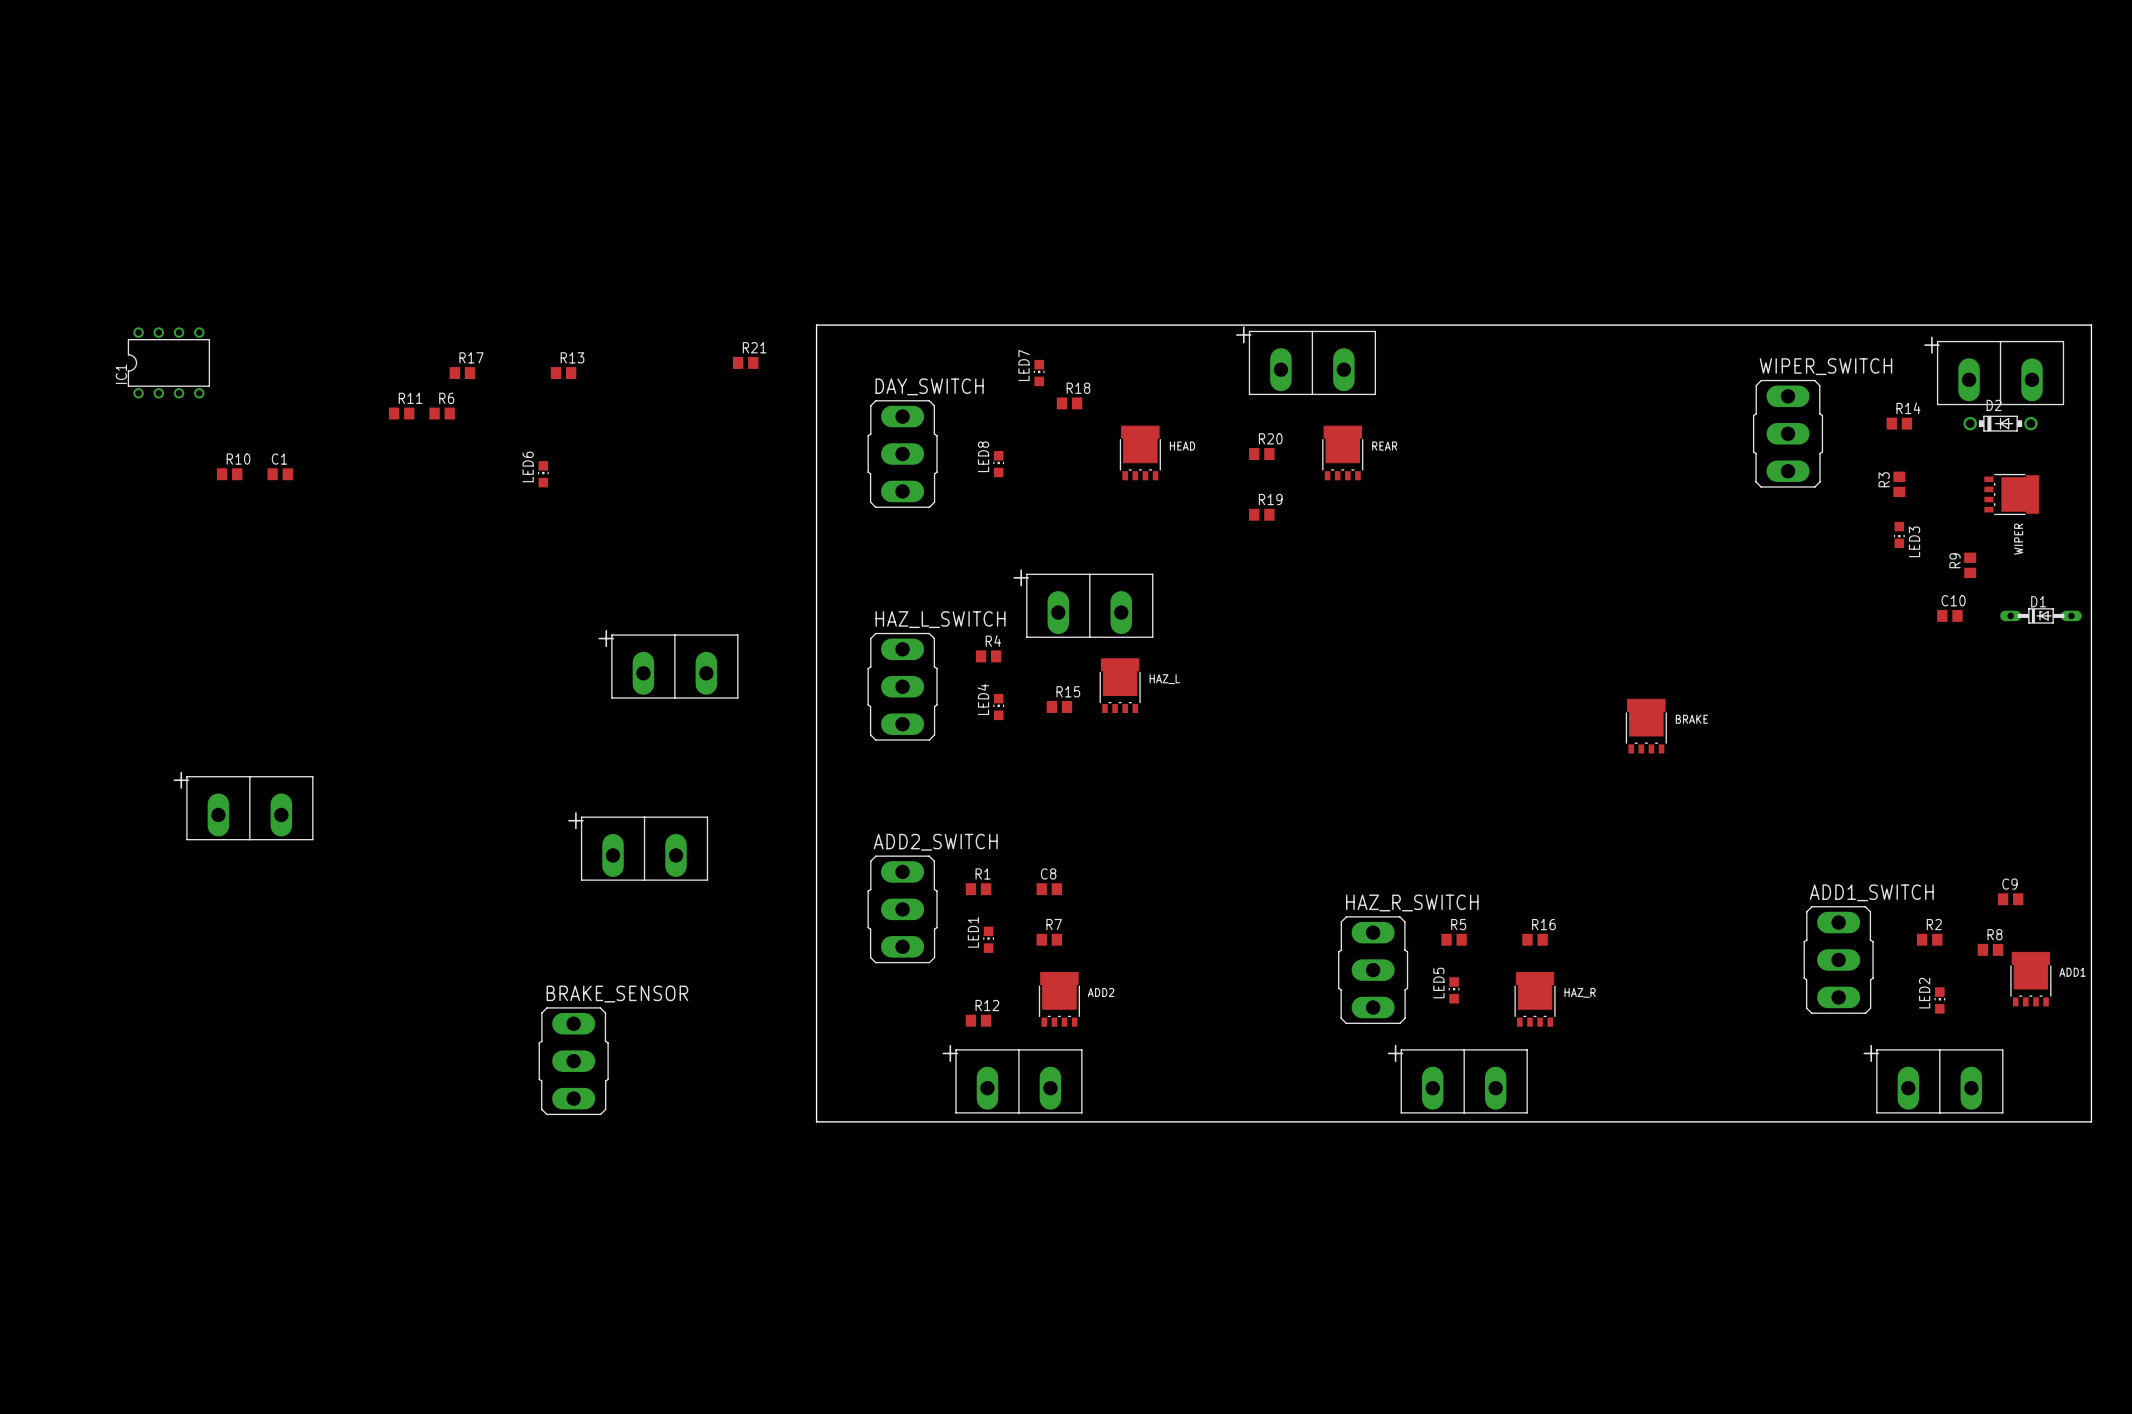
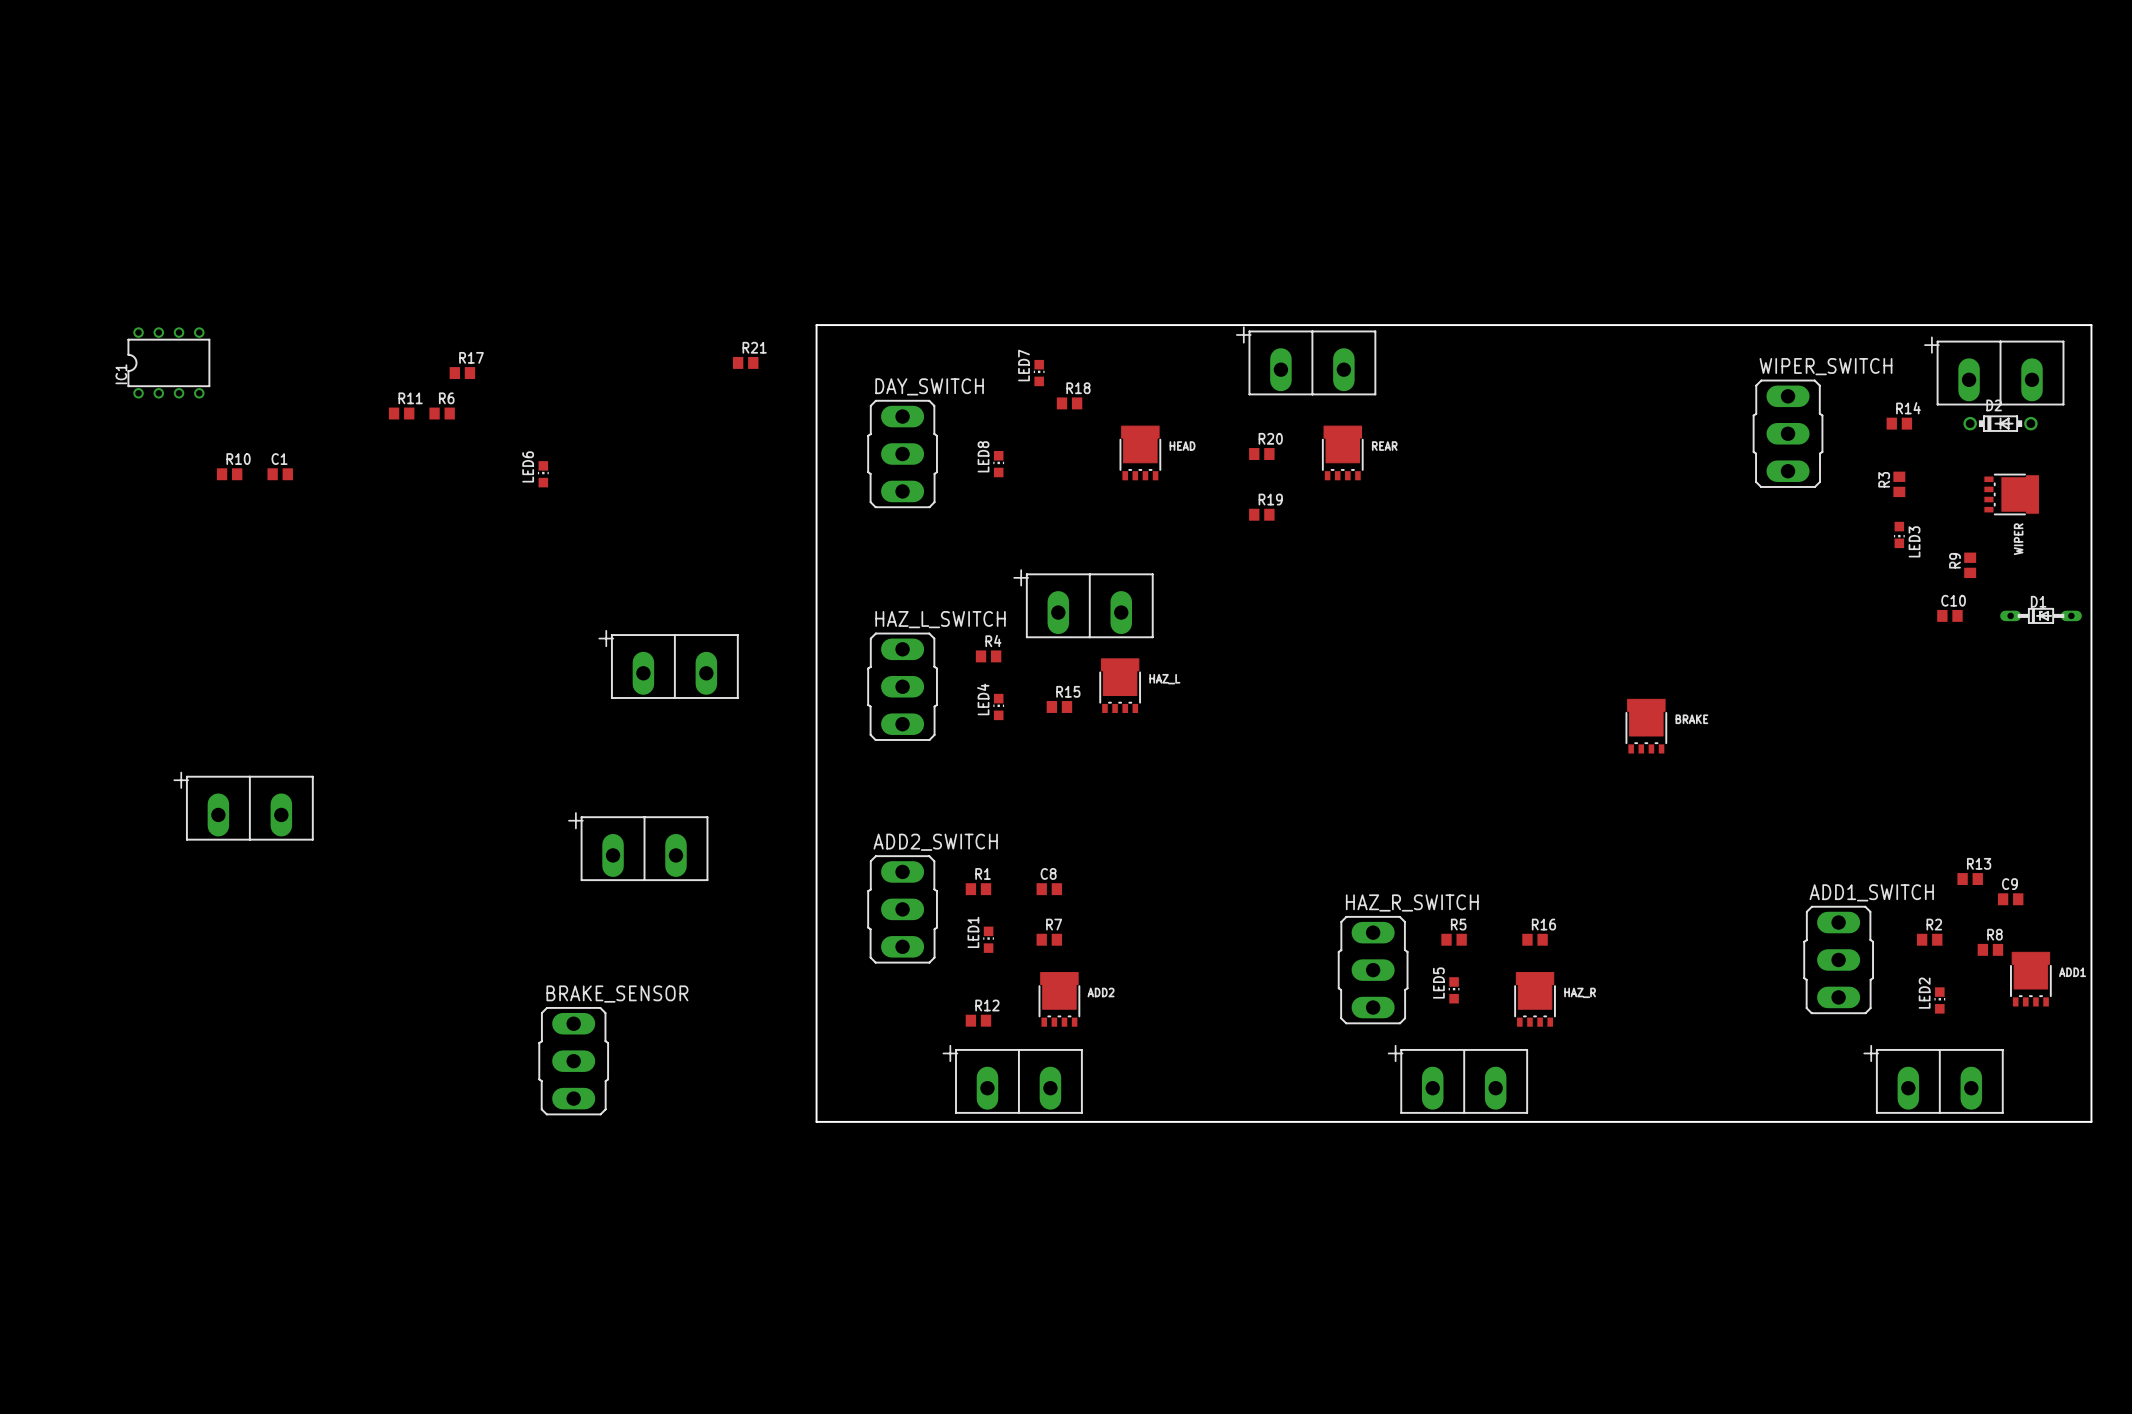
R13 position: (563, 373) -> (1970, 879)

